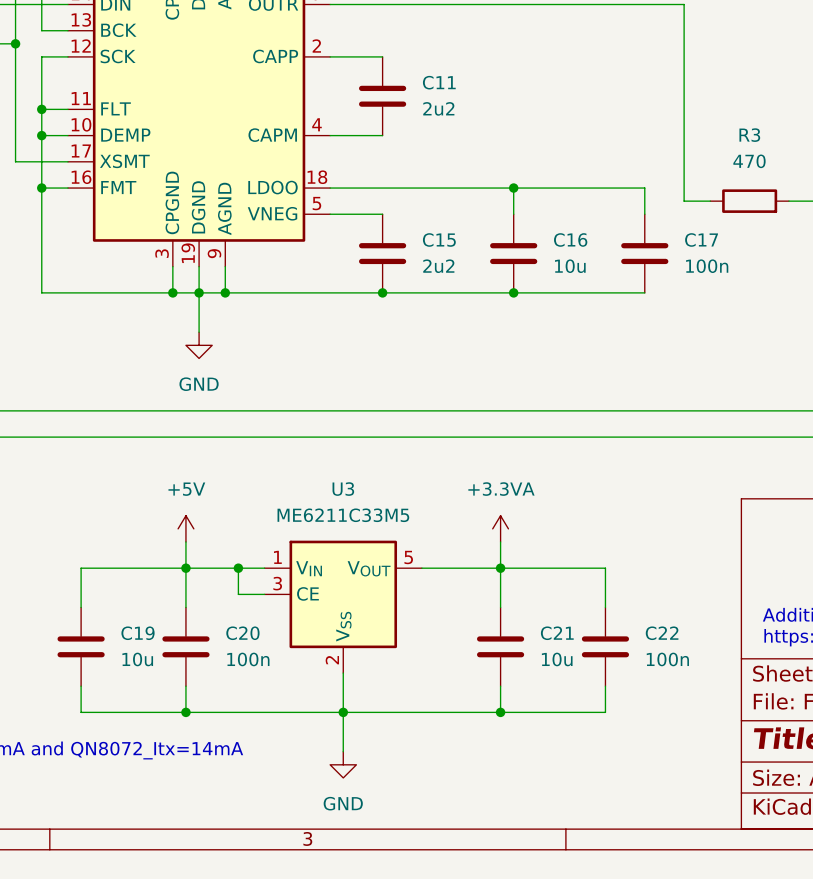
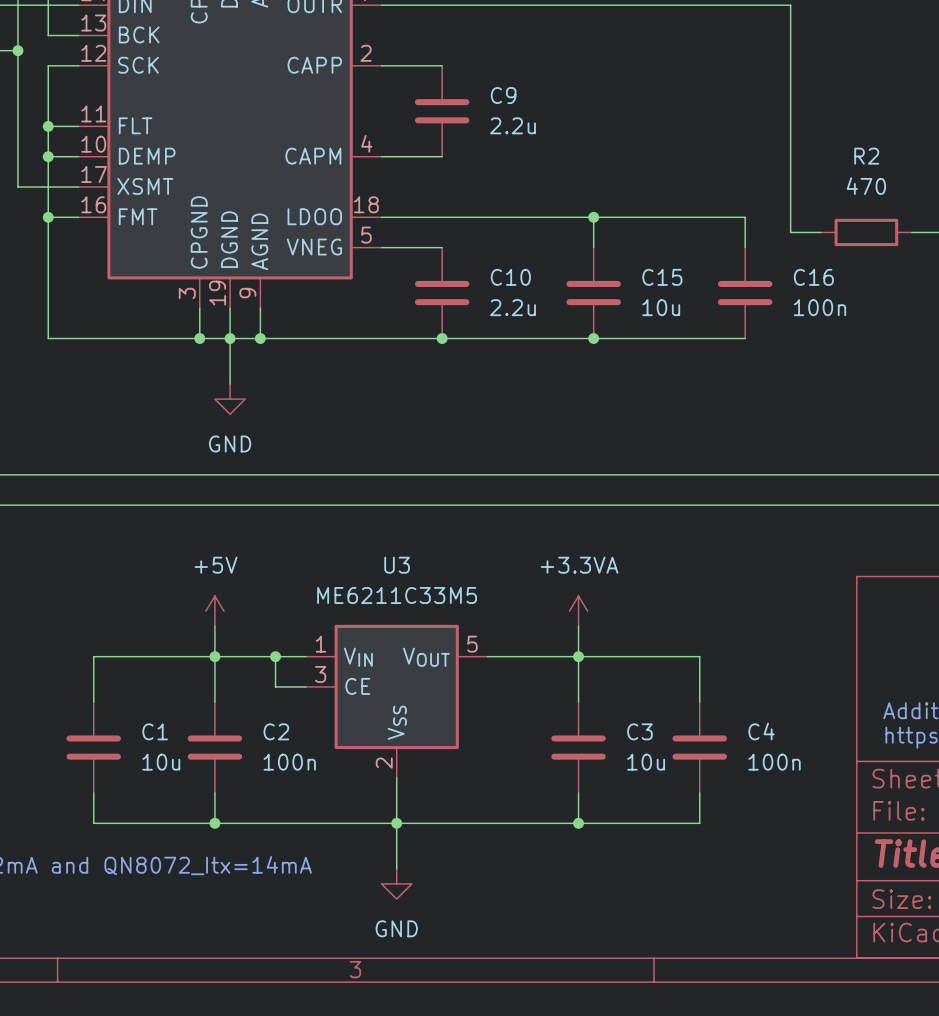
C11 name: C11 (439, 82) -> C9 (503, 95)
C11 value: 2u2 (438, 108) -> 2.2u (512, 125)
R3 name: R3 (749, 135) -> R2 (866, 156)
C15 name: C15 (439, 239) -> C10 (510, 277)
C16 name: C16 (570, 239) -> C15 (662, 277)
C17 name: C17 (701, 239) -> C16 (813, 277)
C15 value: 2u2 (438, 266) -> 2.2u (512, 307)
C19 name: C19 (138, 633) -> C1 (155, 731)
C20 name: C20 (242, 633) -> C2 (276, 731)
C21 name: C21 (557, 633) -> C3 (639, 731)
C22 name: C22 (662, 633) -> C4 (761, 731)

